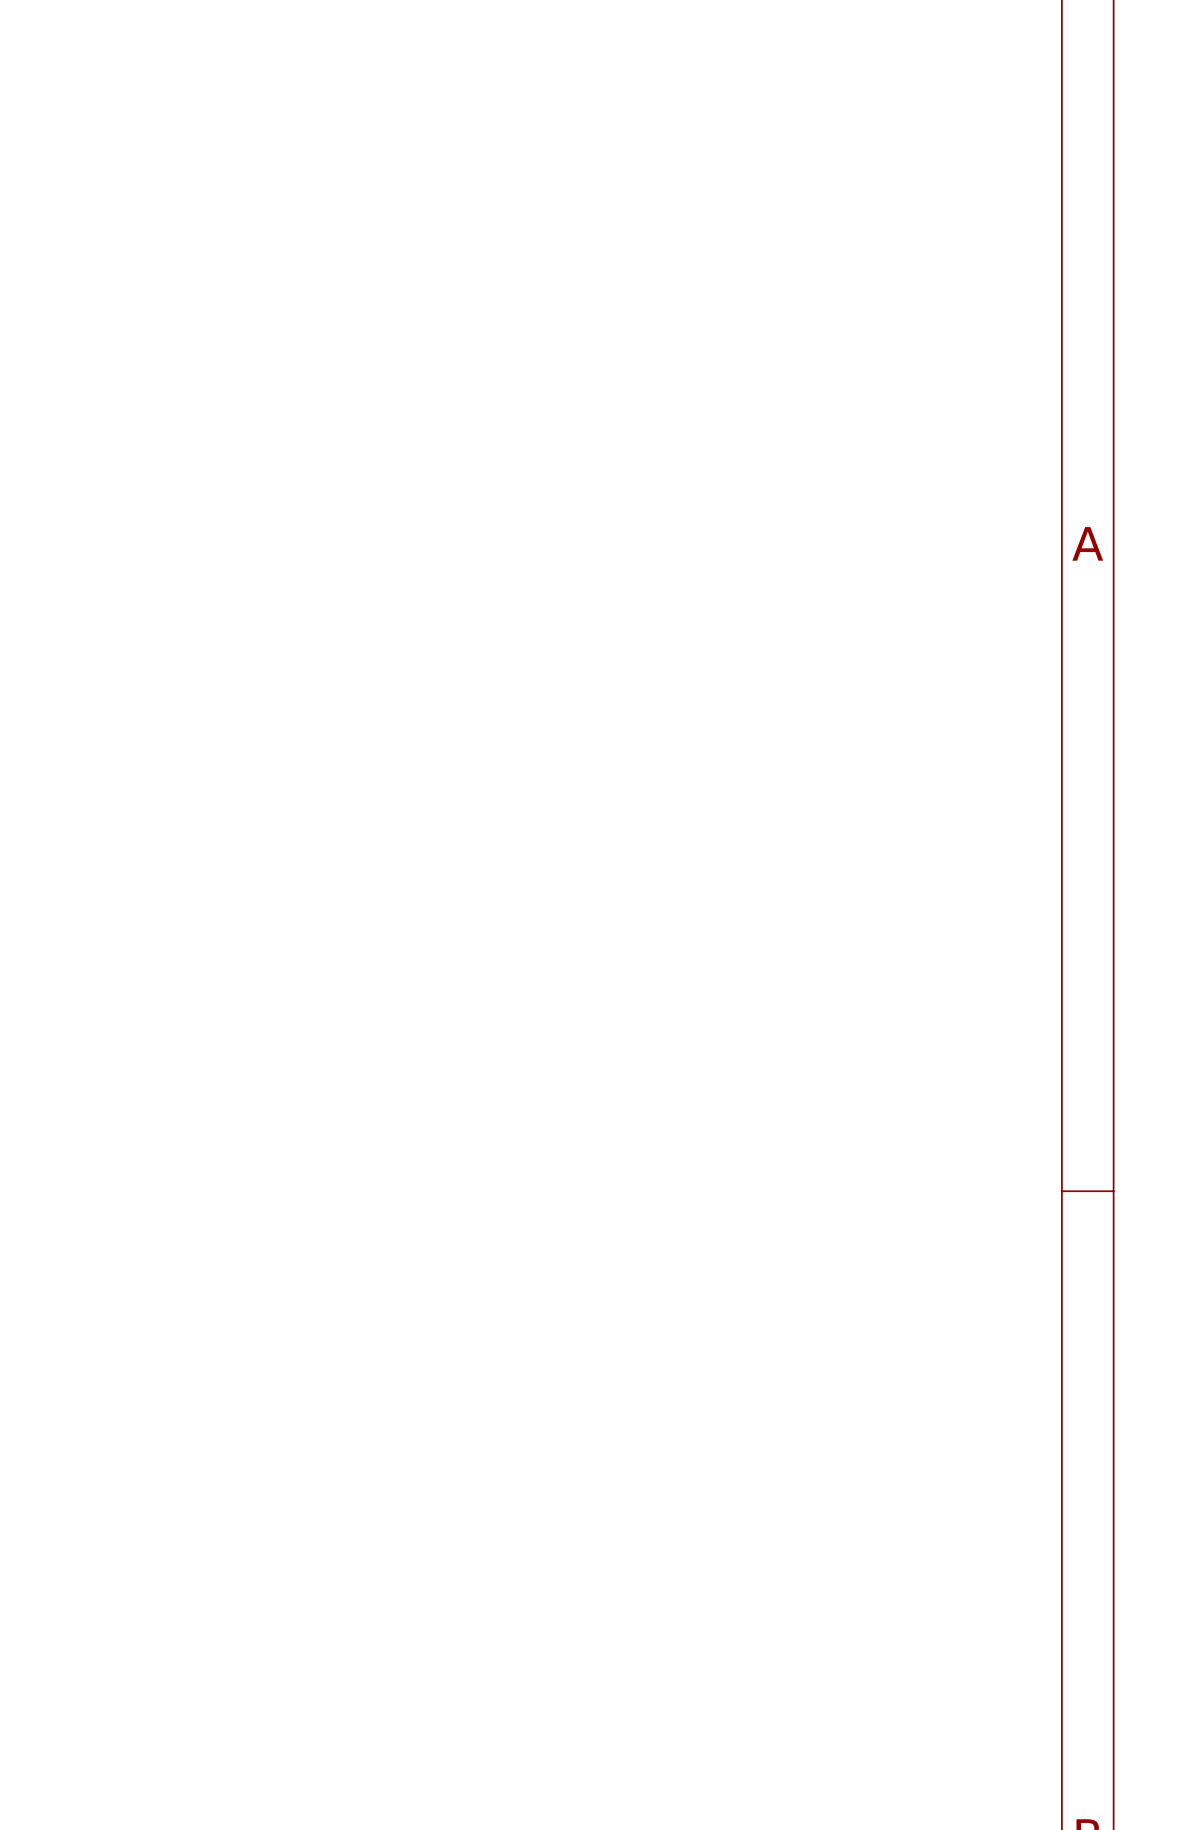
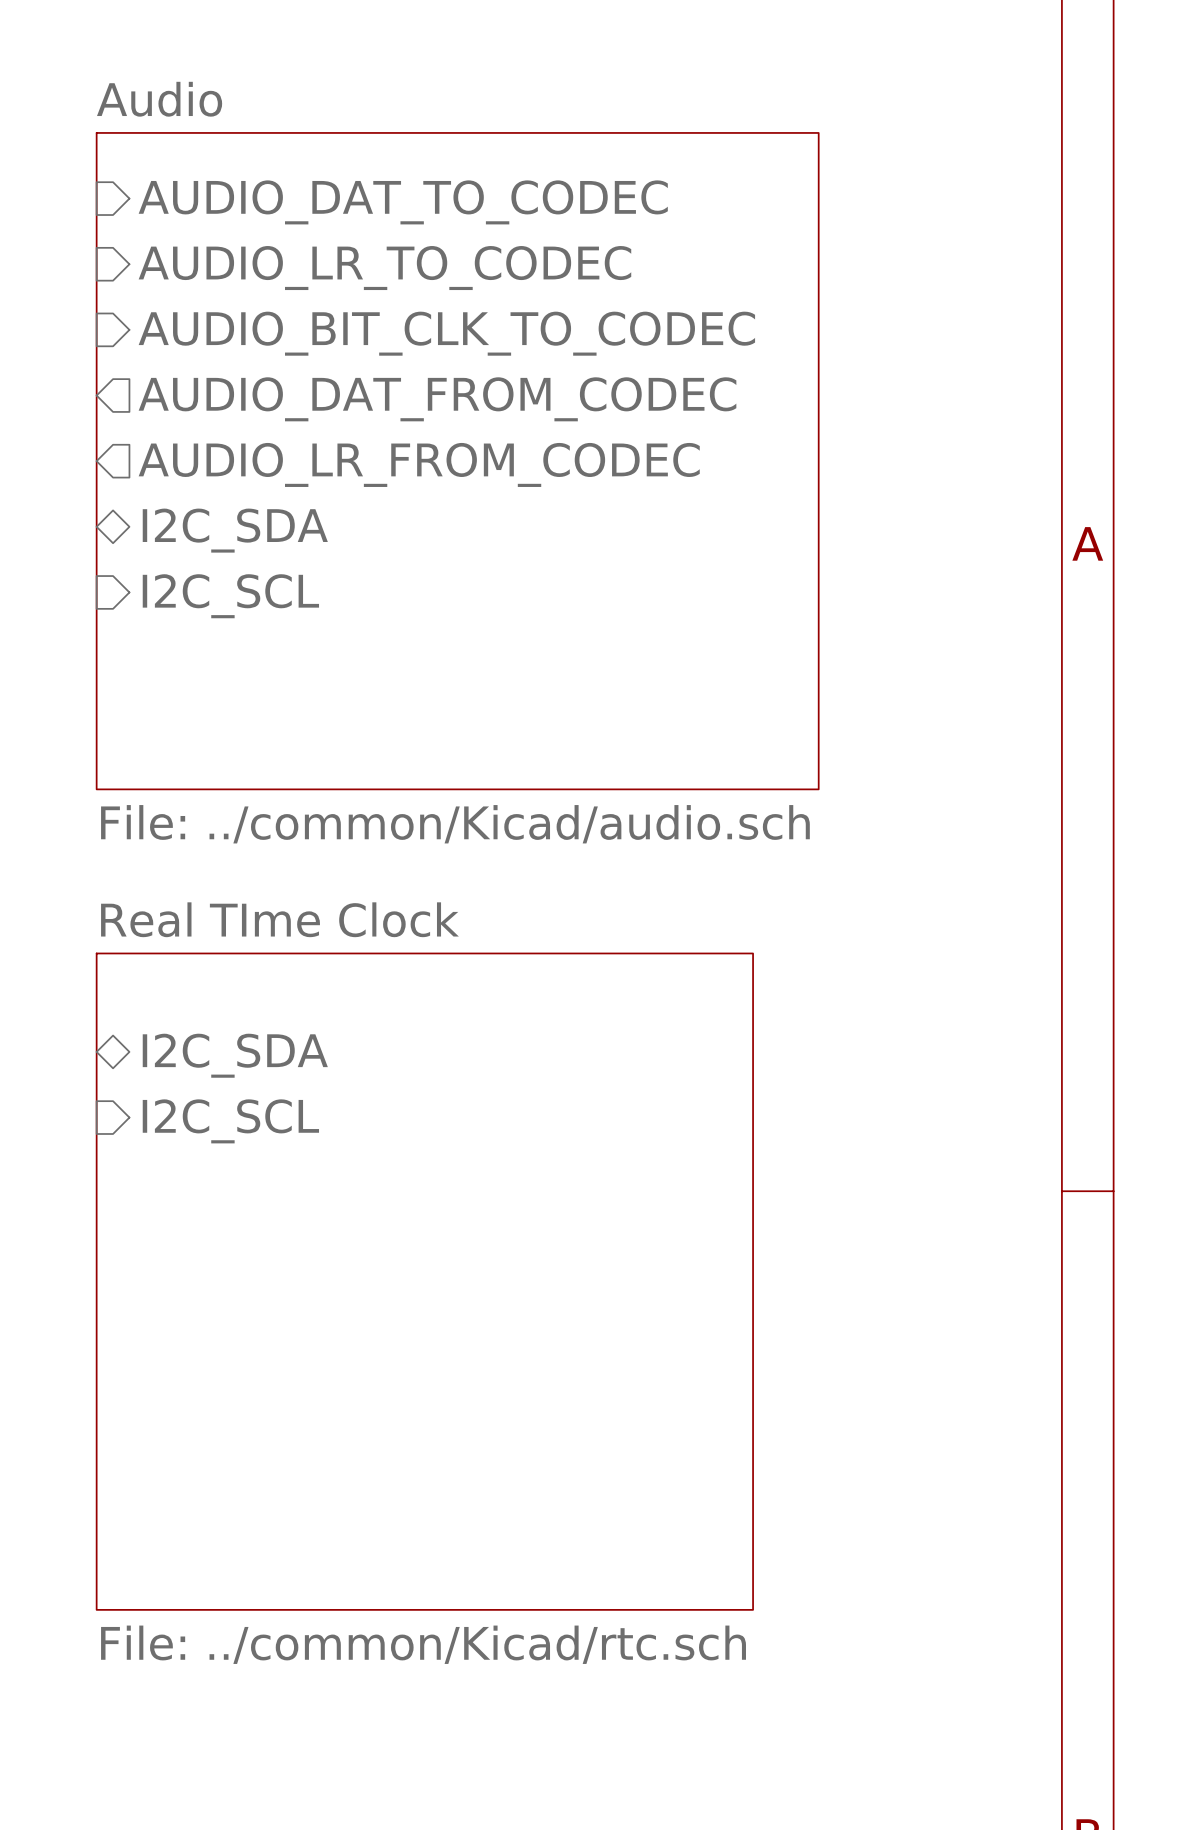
sheet pin: none -> AUDIO_DAT_TO_CODEC (403, 202)
sheet pin: none -> AUDIO_LR_TO_CODEC (384, 268)
sheet pin: none -> AUDIO_BIT_CLK_TO_CODEC (446, 333)
sheet pin: none -> AUDIO_DAT_FROM_CODEC (437, 399)
sheet Audio: none -> File: ../common/Kicad/audio.sch (457, 461)
sheet pin: none -> AUDIO_LR_FROM_CODEC (419, 464)
sheet pin: none -> I2C_SDA (235, 530)
sheet pin: none -> I2C_SCL (230, 596)
sheet pin: none -> I2C_SDA (235, 1055)
sheet pin: none -> I2C_SCL (230, 1121)
sheet Real TIme Clock: none -> File: ../common/Kicad/rtc.sch (424, 1281)

